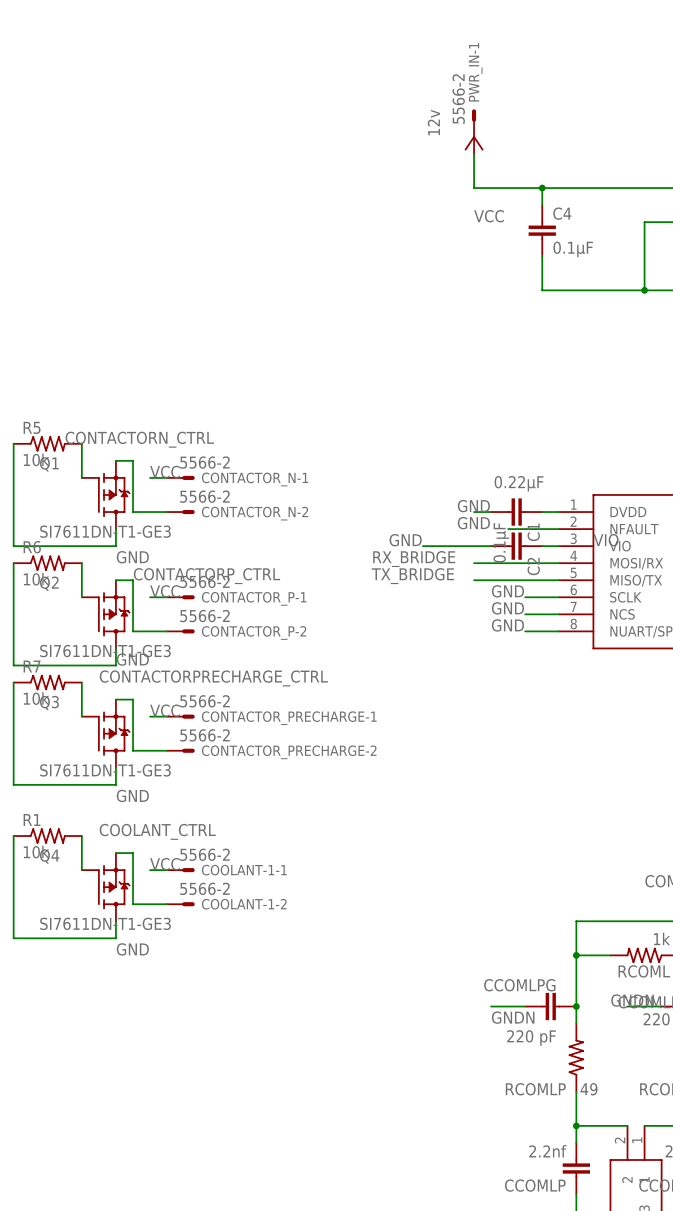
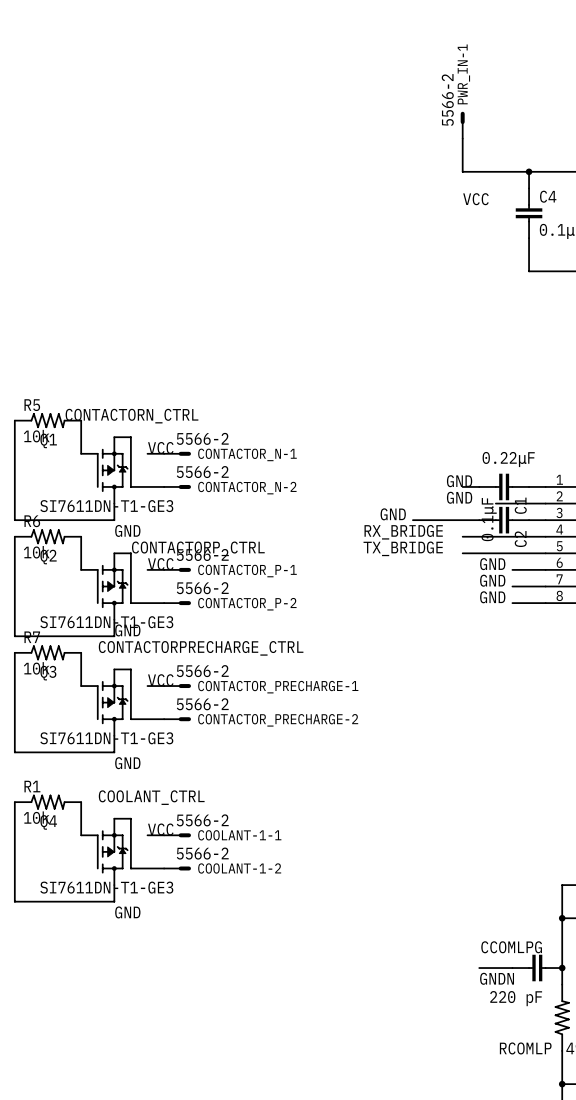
PWR_IN-1 position: (474, 123) -> (462, 125)
power symbol: 12v (474, 144) -> none

